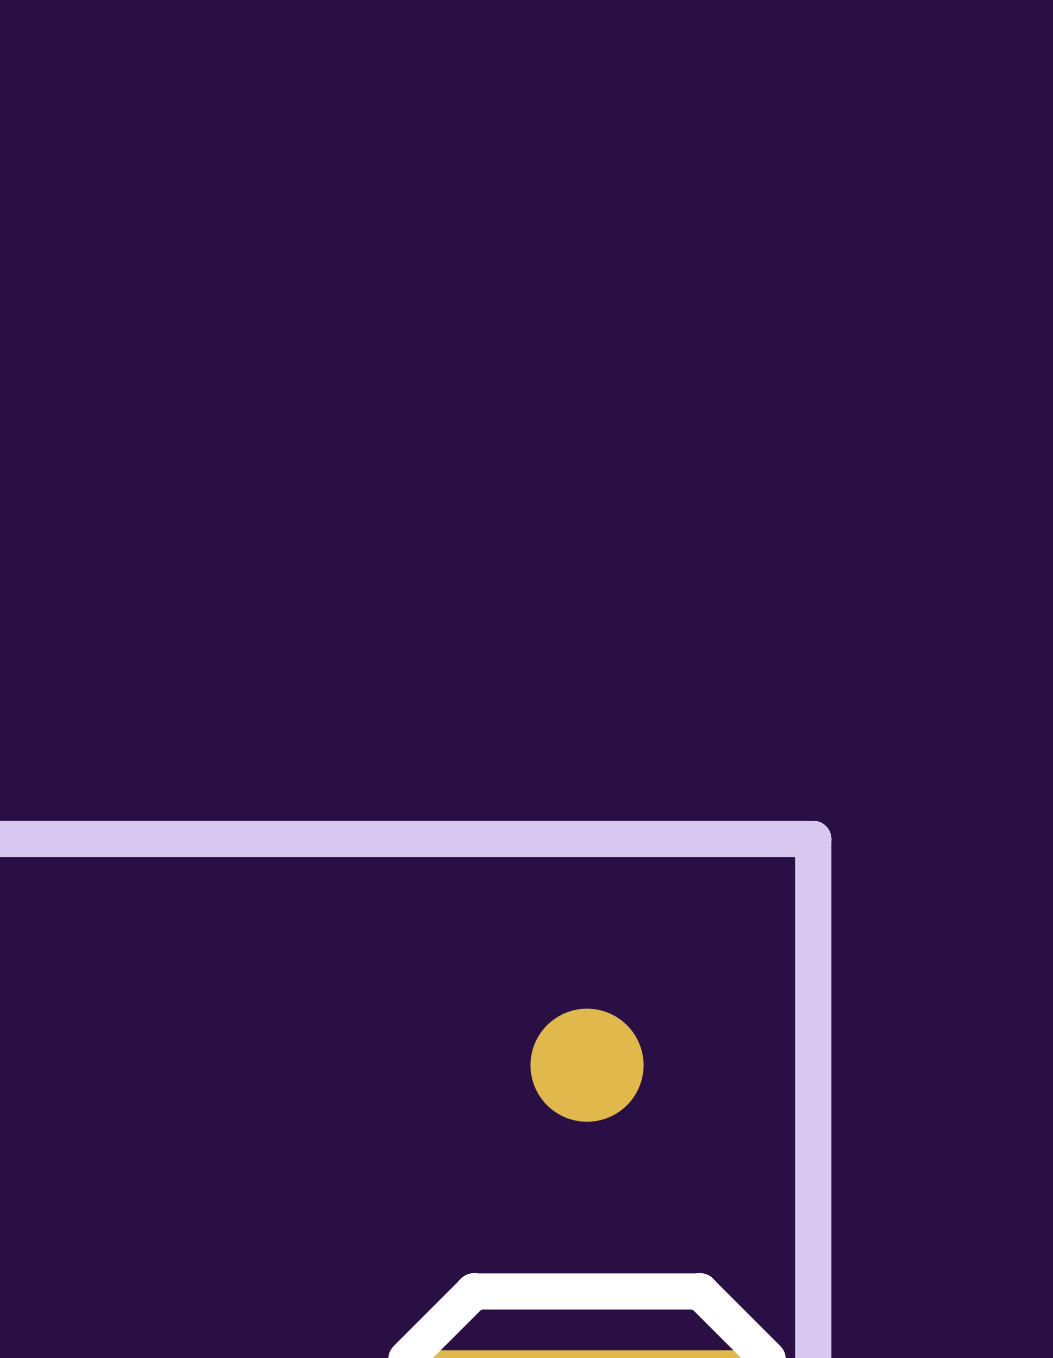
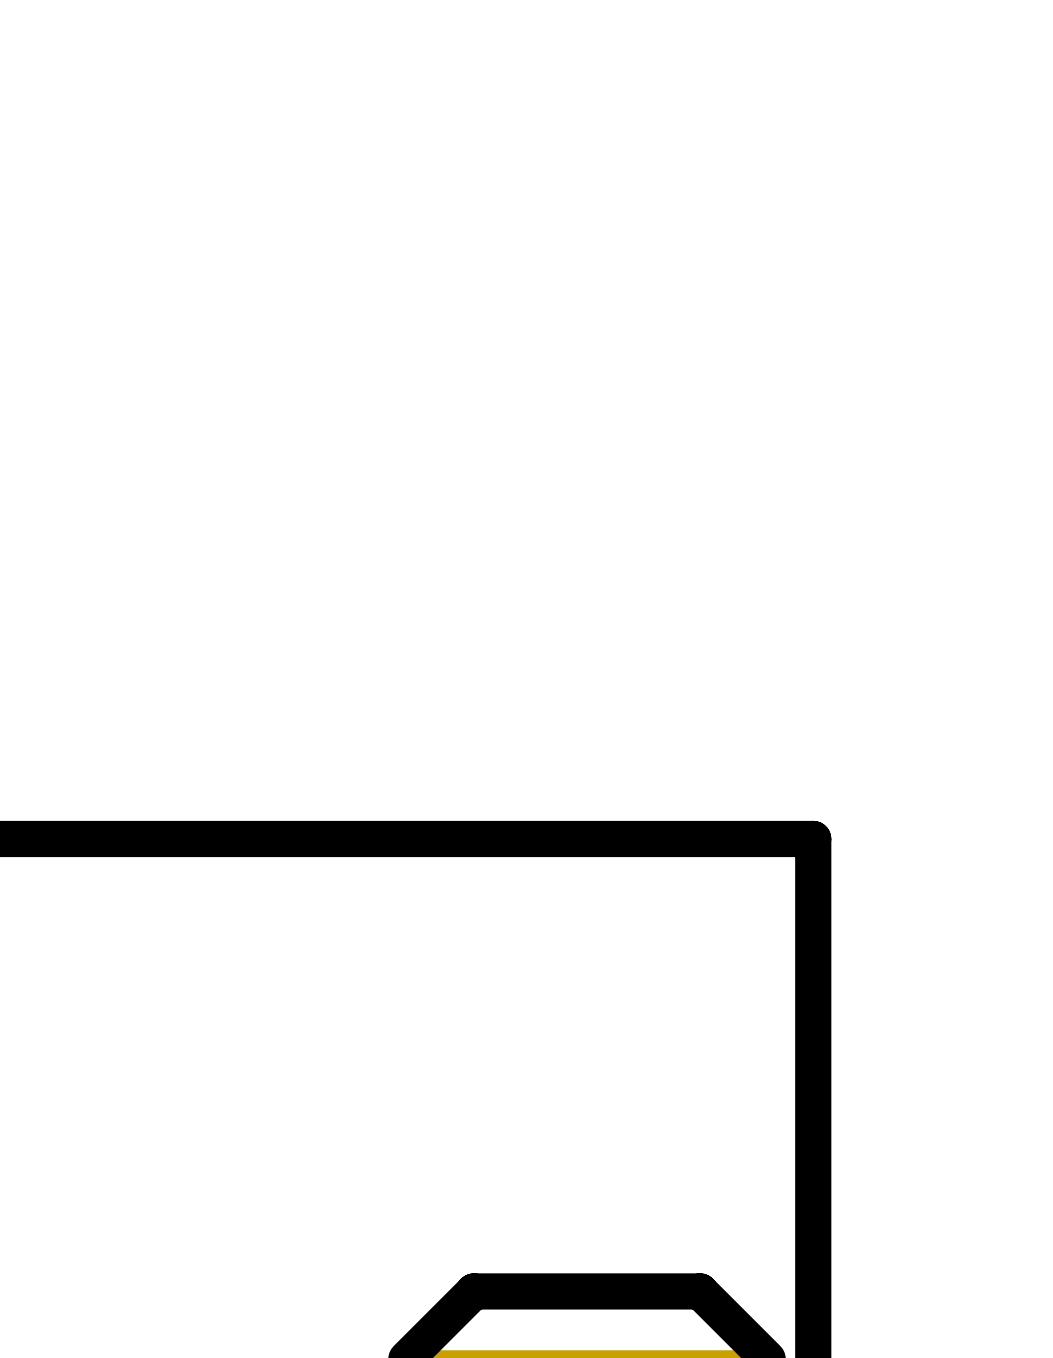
part: (587, 1065) -> none

